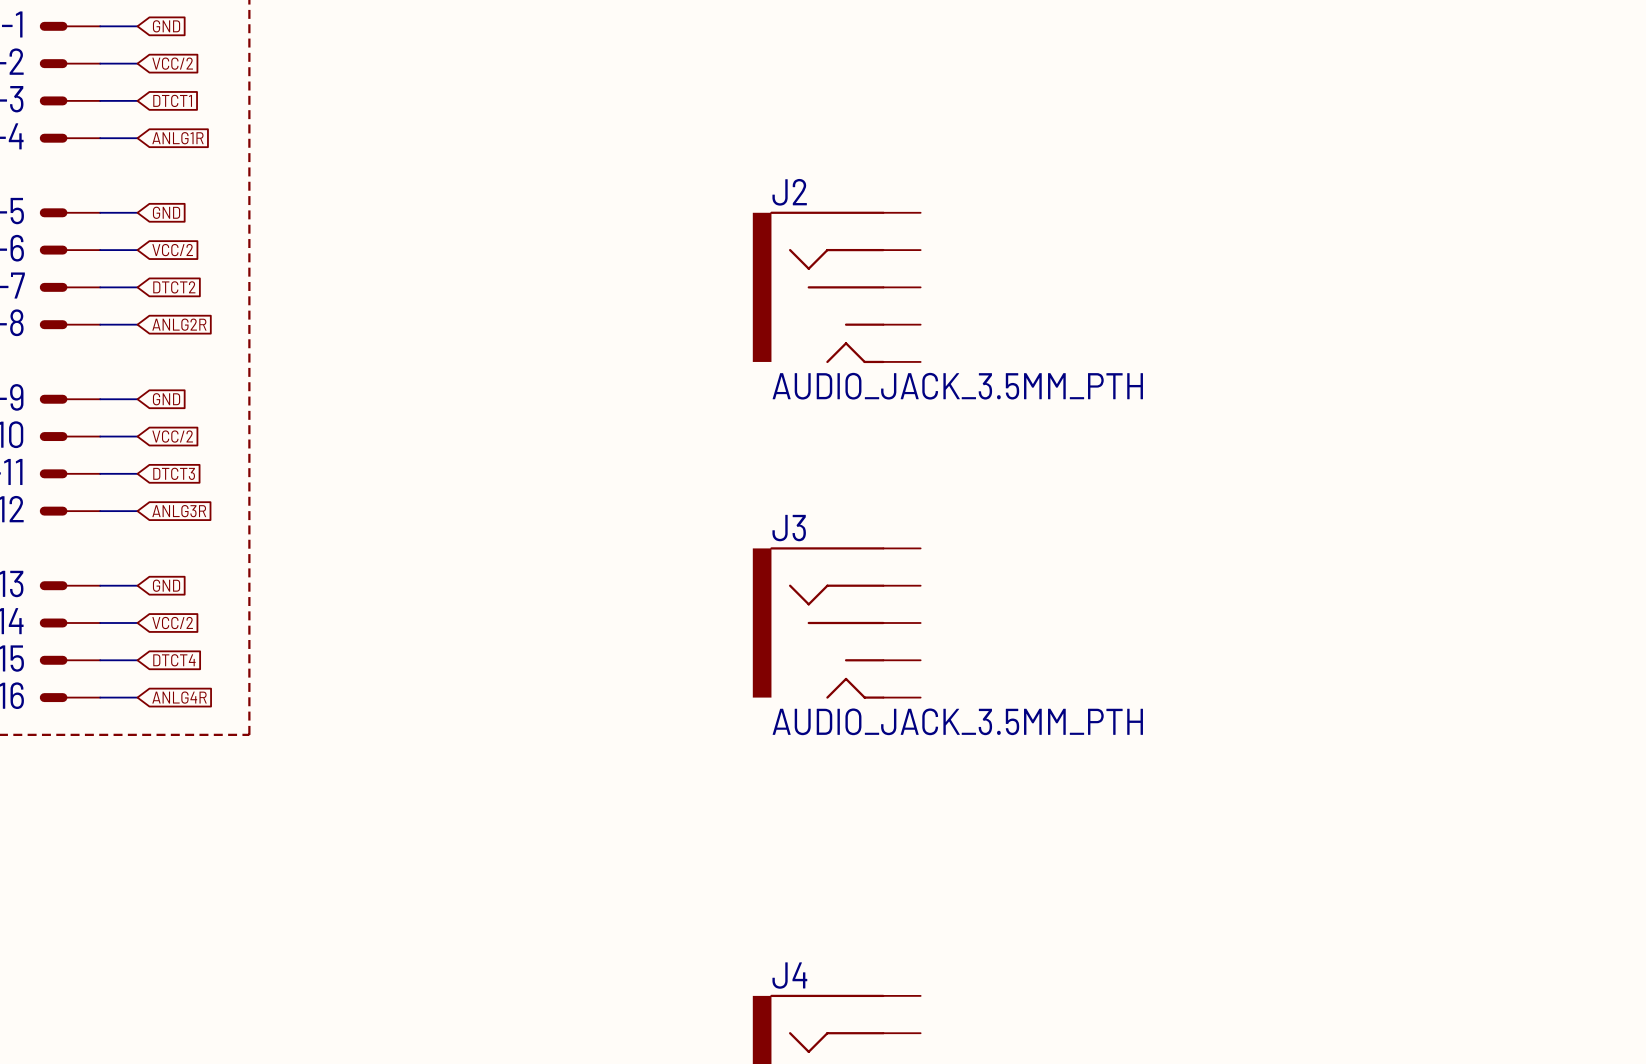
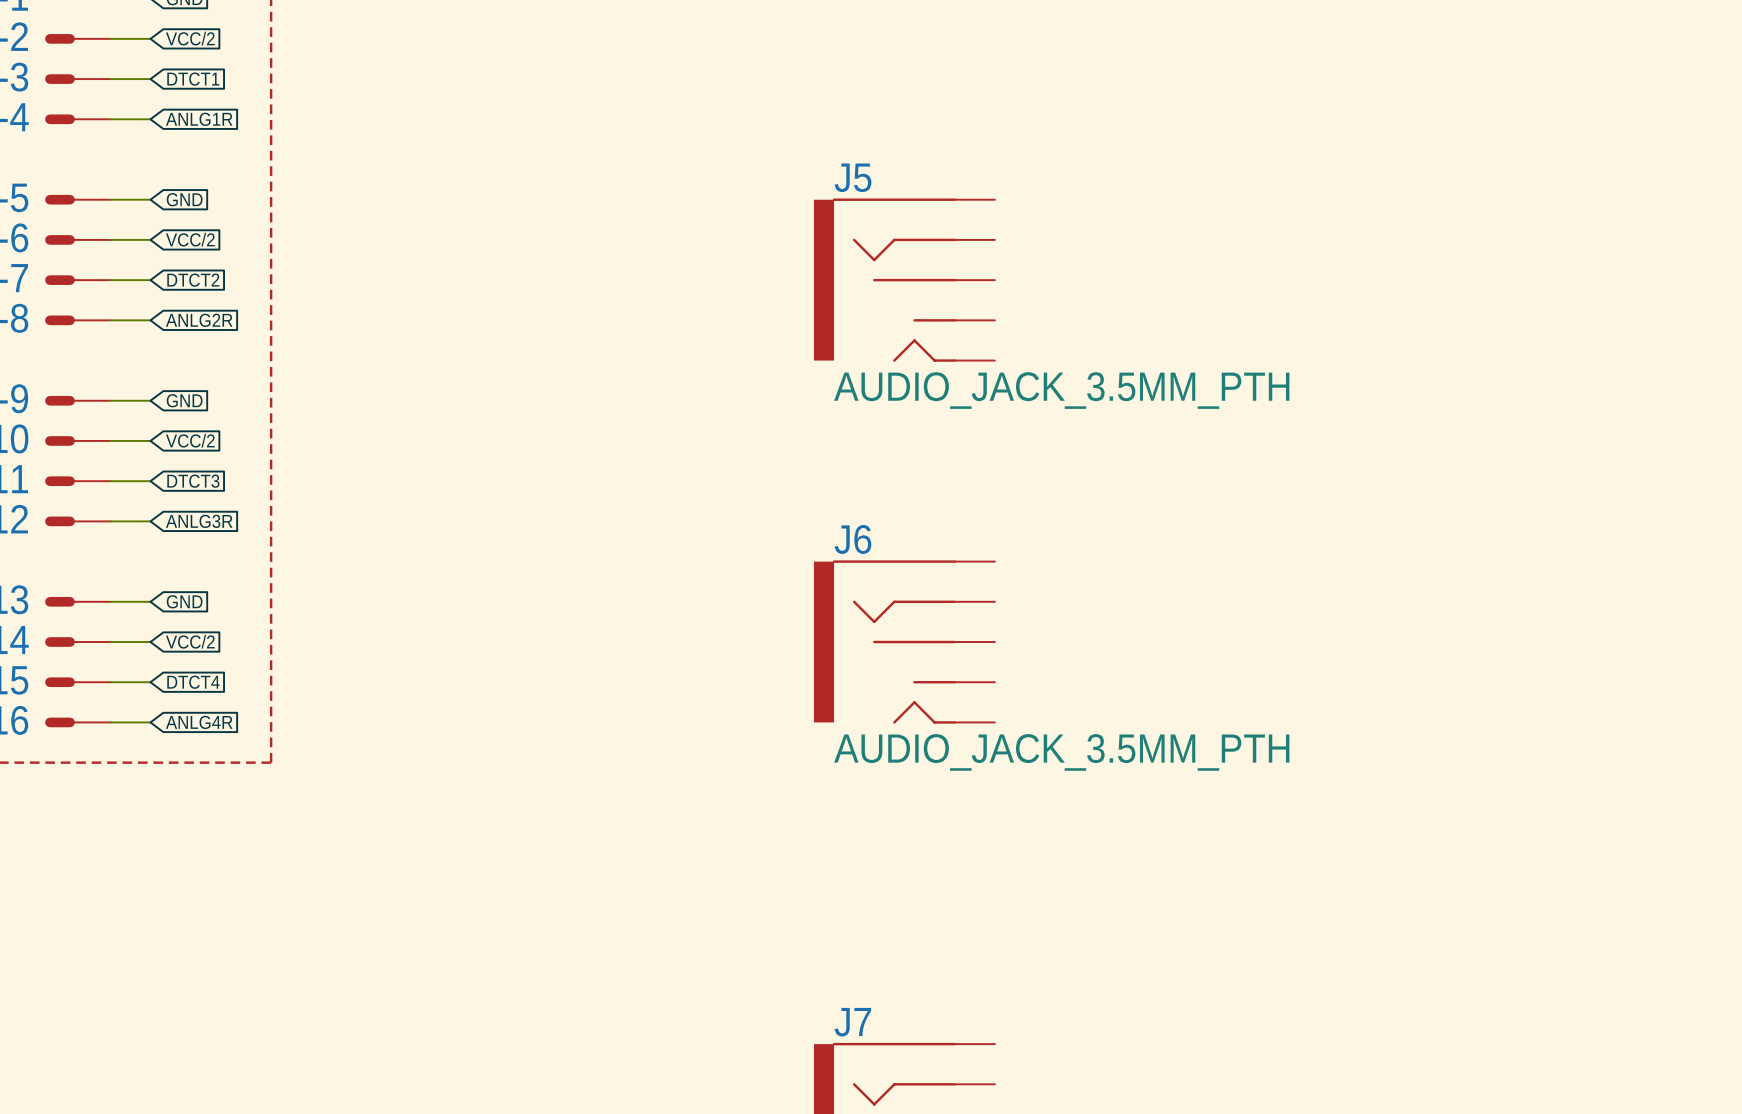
J2 name: J2 (789, 192) -> J5 (853, 177)
J3 name: J3 (789, 528) -> J6 (852, 539)
J4 name: J4 (789, 975) -> J7 (852, 1022)

